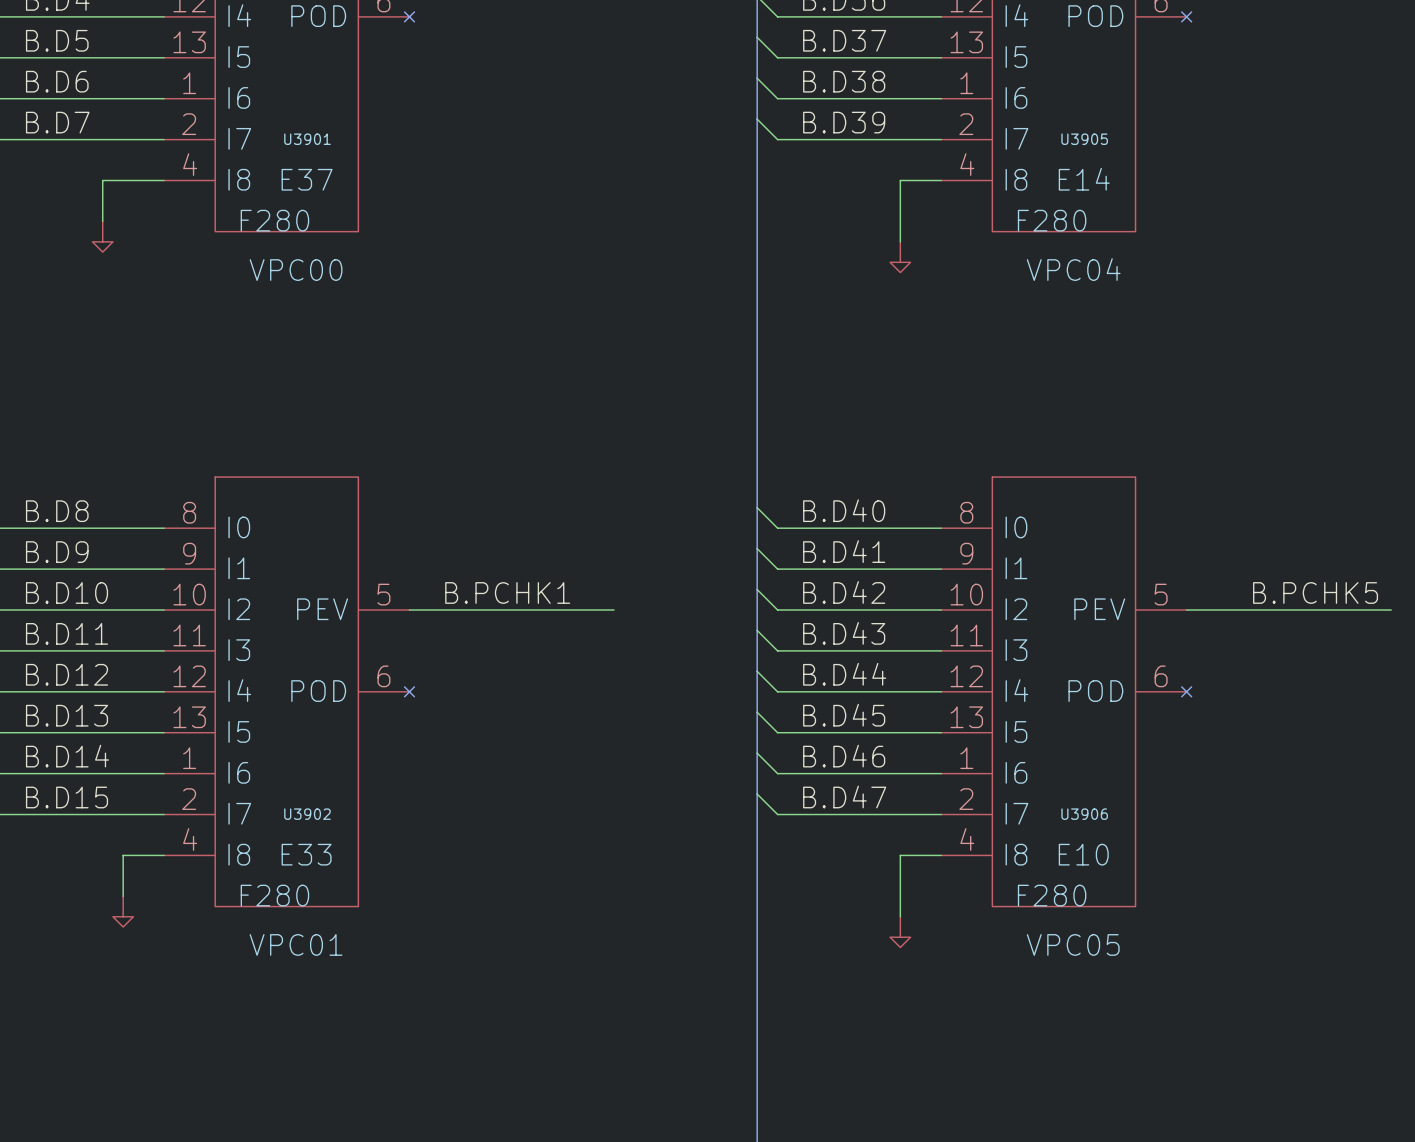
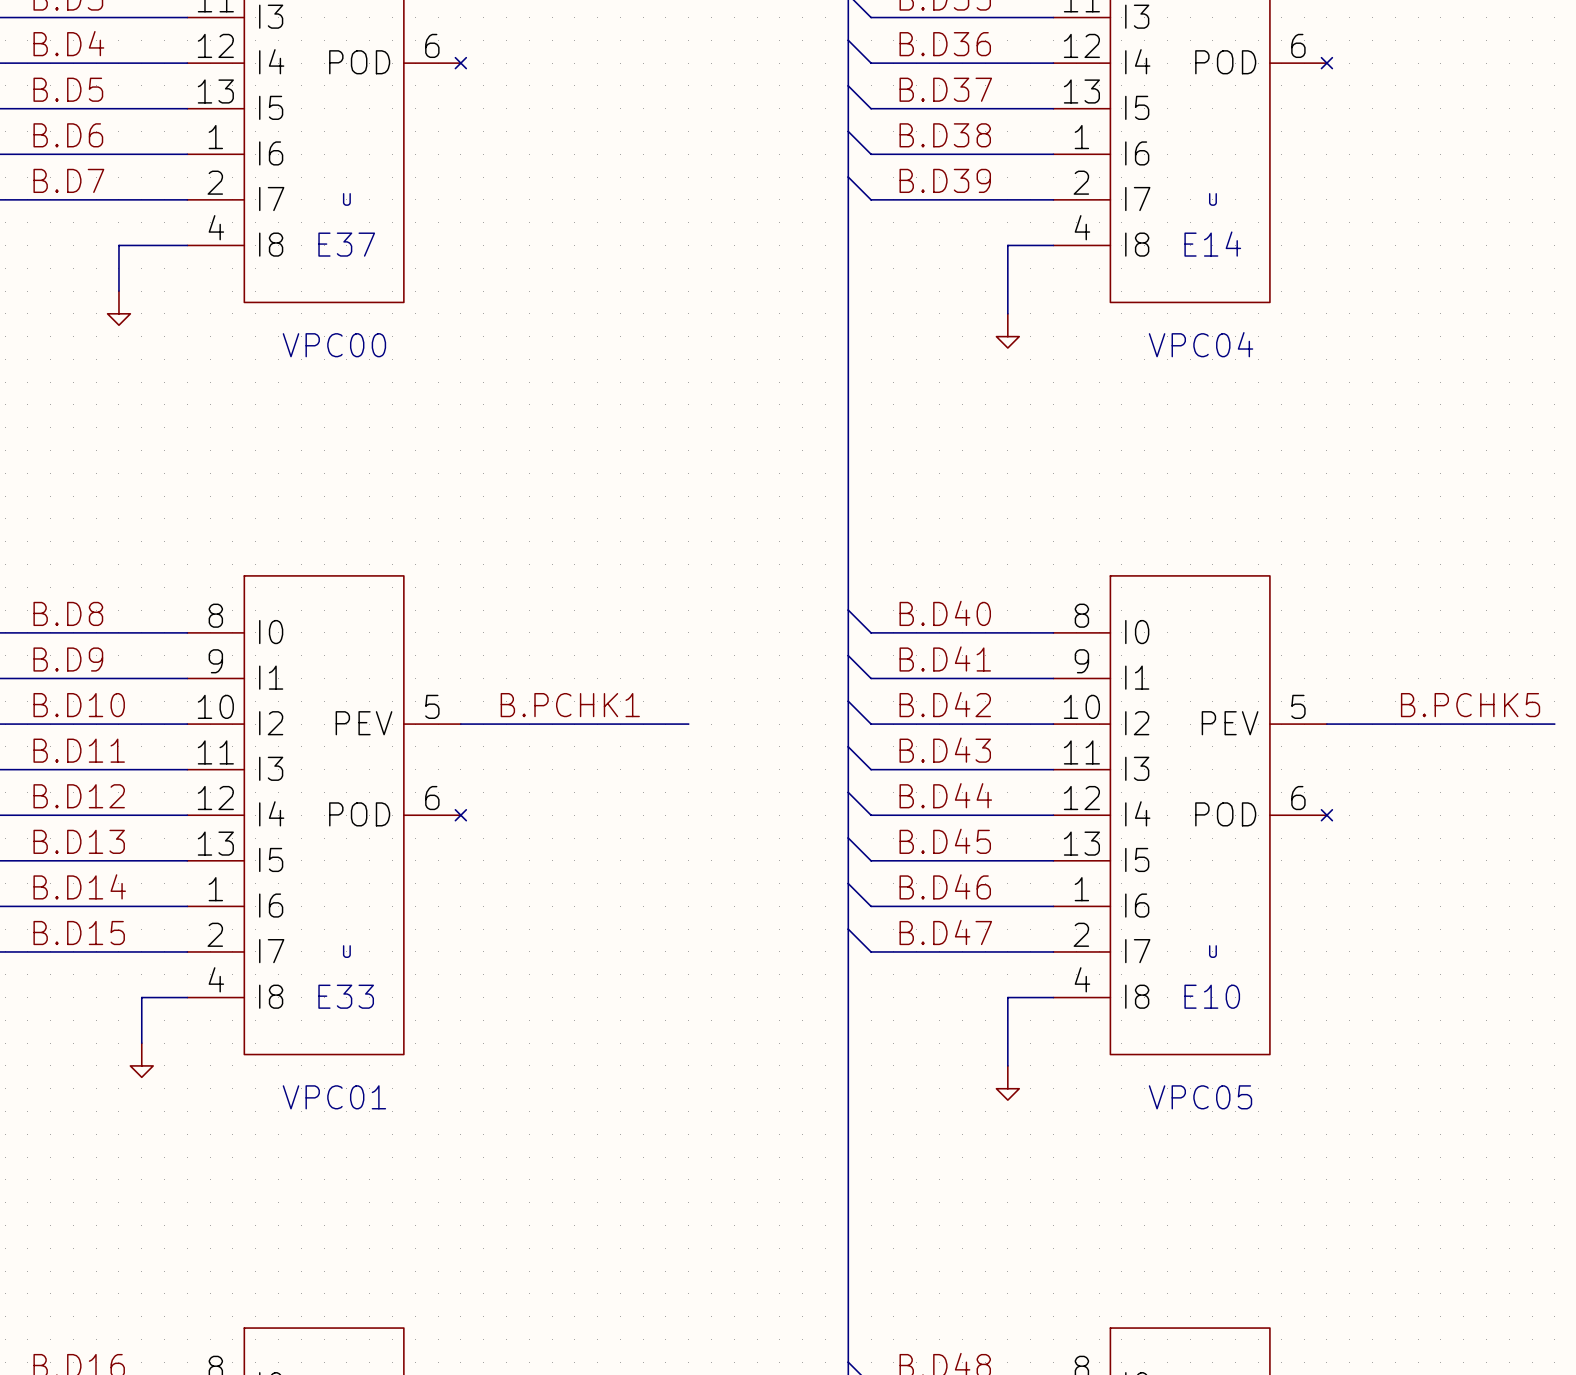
U3901 name: U3901 (307, 139) -> U (346, 199)
U3905 name: U3905 (1084, 139) -> U (1212, 199)
U3901 value: F280 (274, 220) -> none
U3905 value: F280 (1052, 220) -> none
U3902 name: U3902 (307, 814) -> U (346, 951)
U3906 name: U3906 (1084, 814) -> U (1212, 951)
U3902 value: F280 (274, 895) -> none
U3906 value: F280 (1052, 895) -> none

